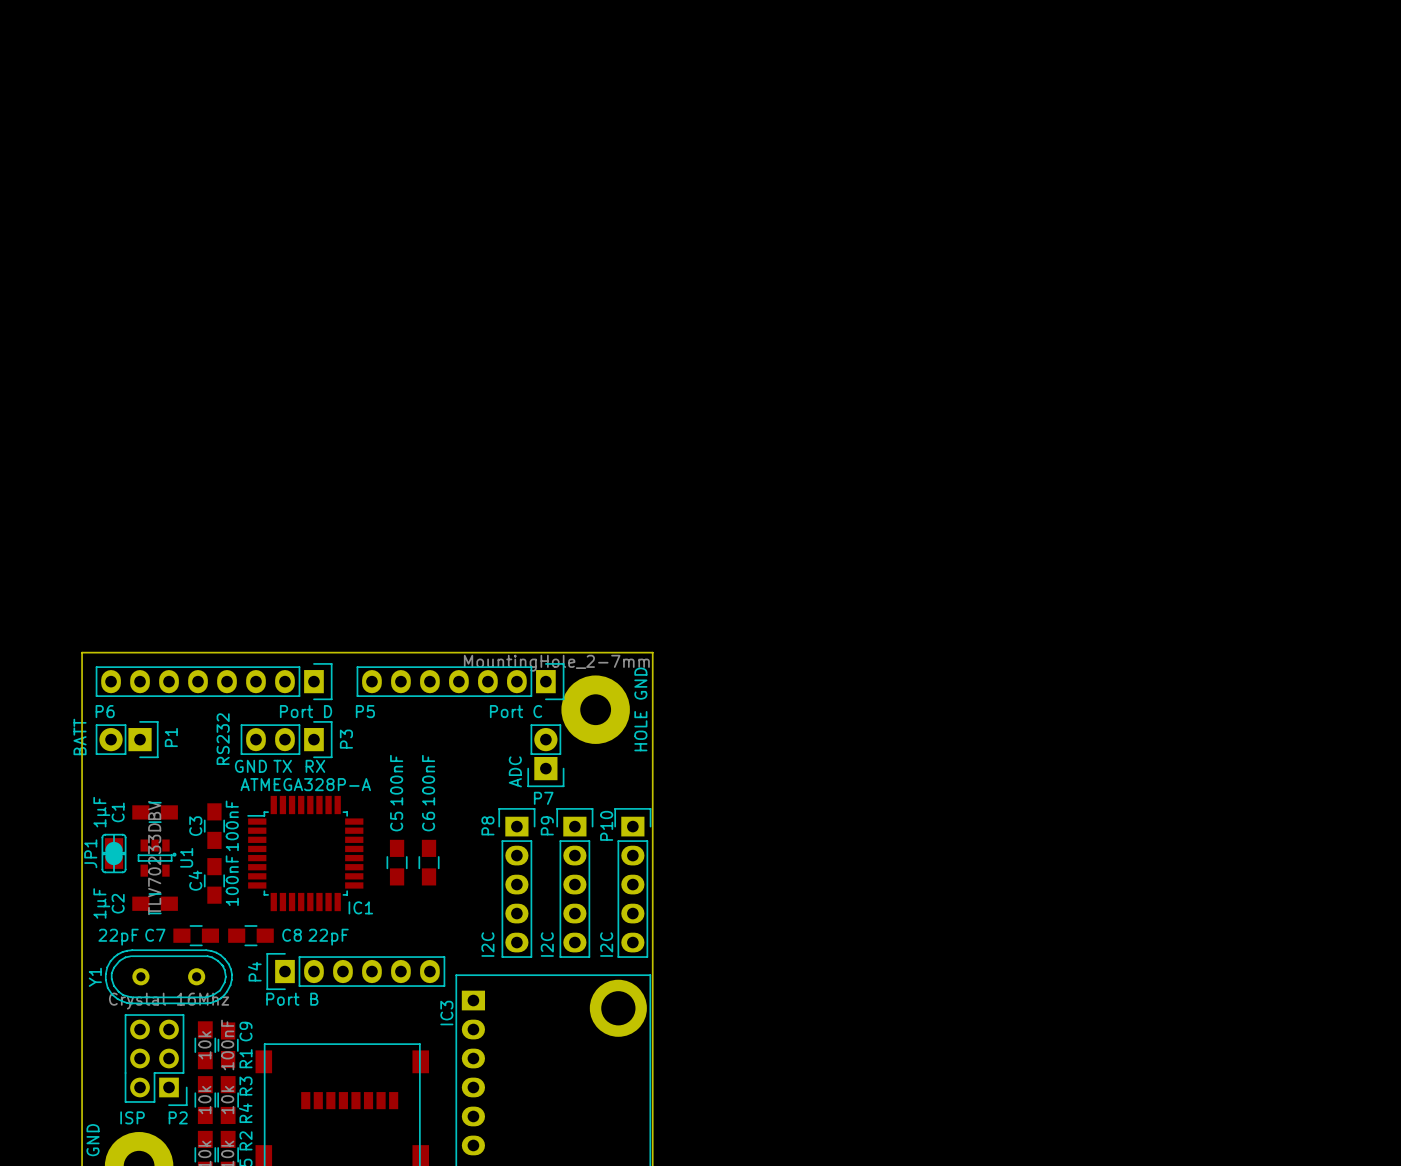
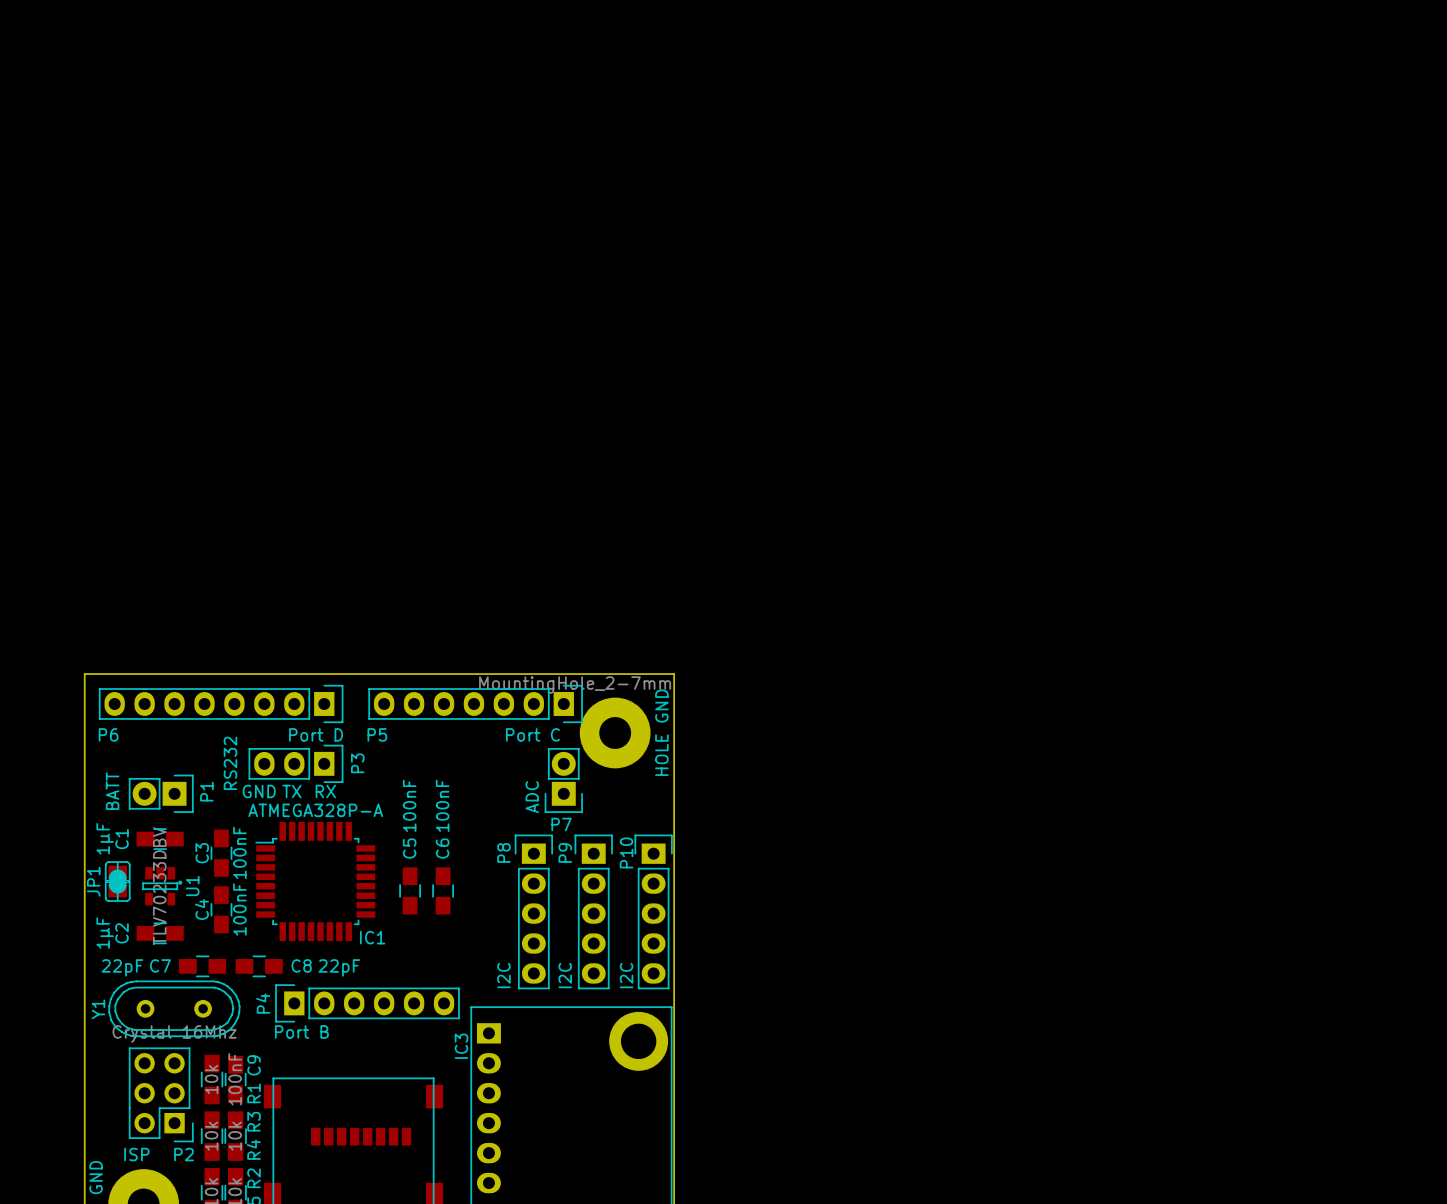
P1 position: (127, 739) -> (161, 793)

